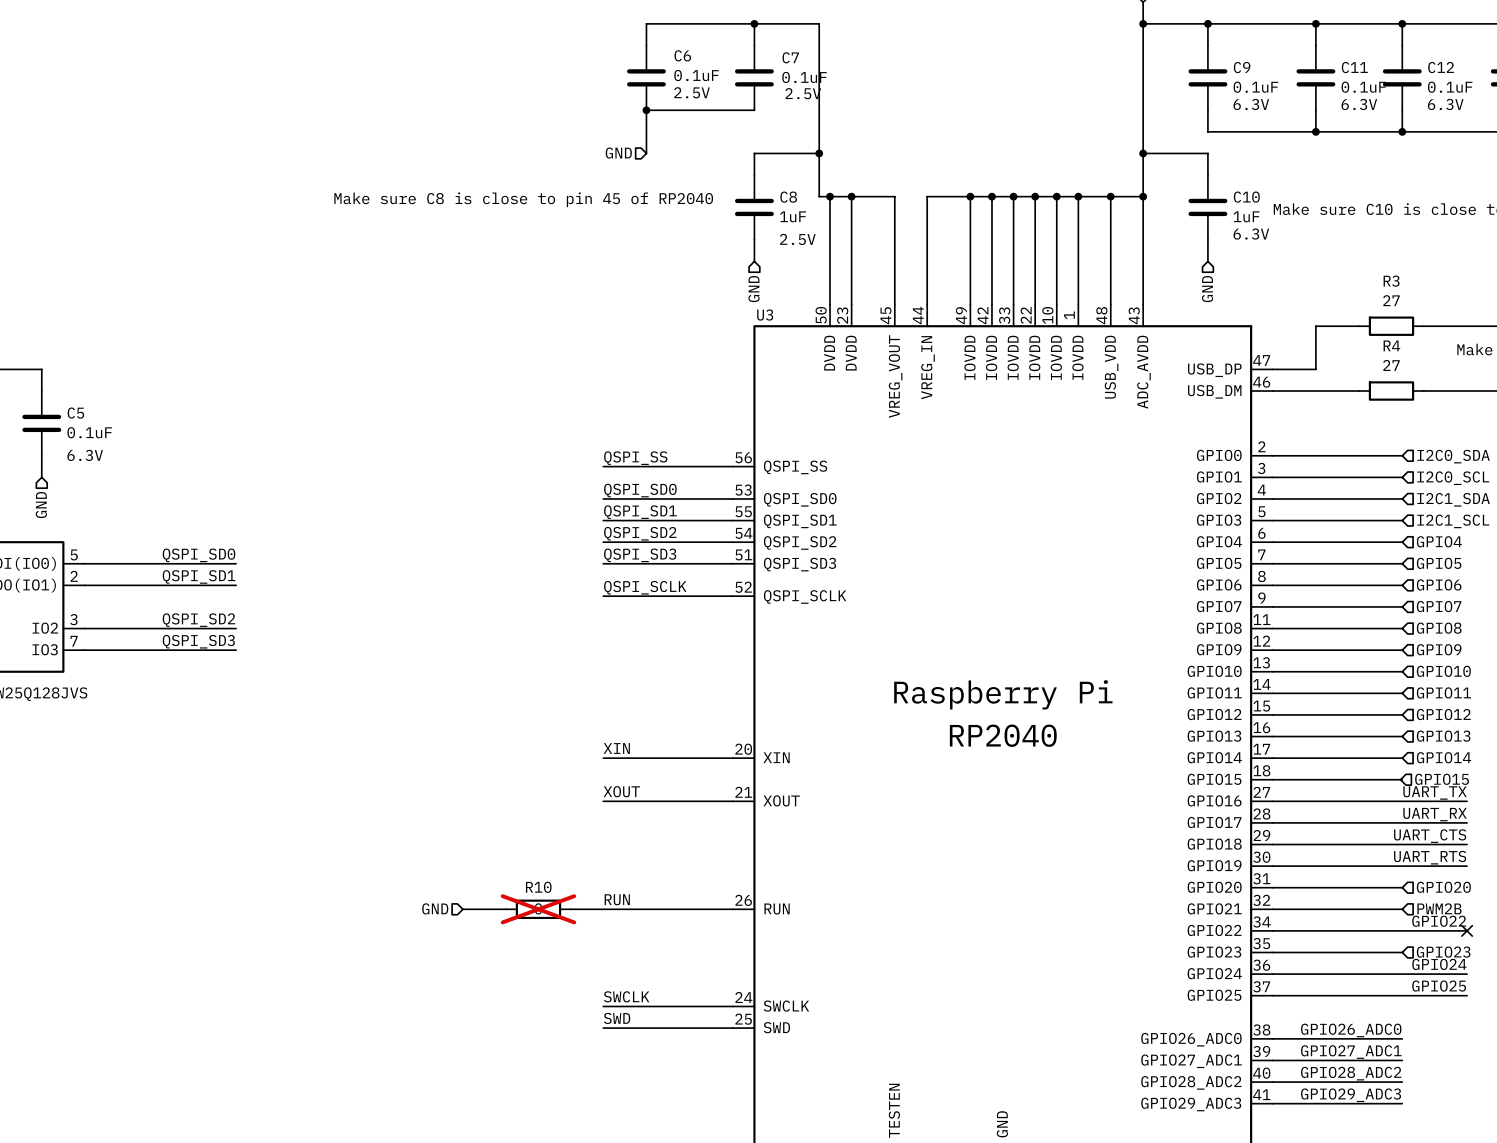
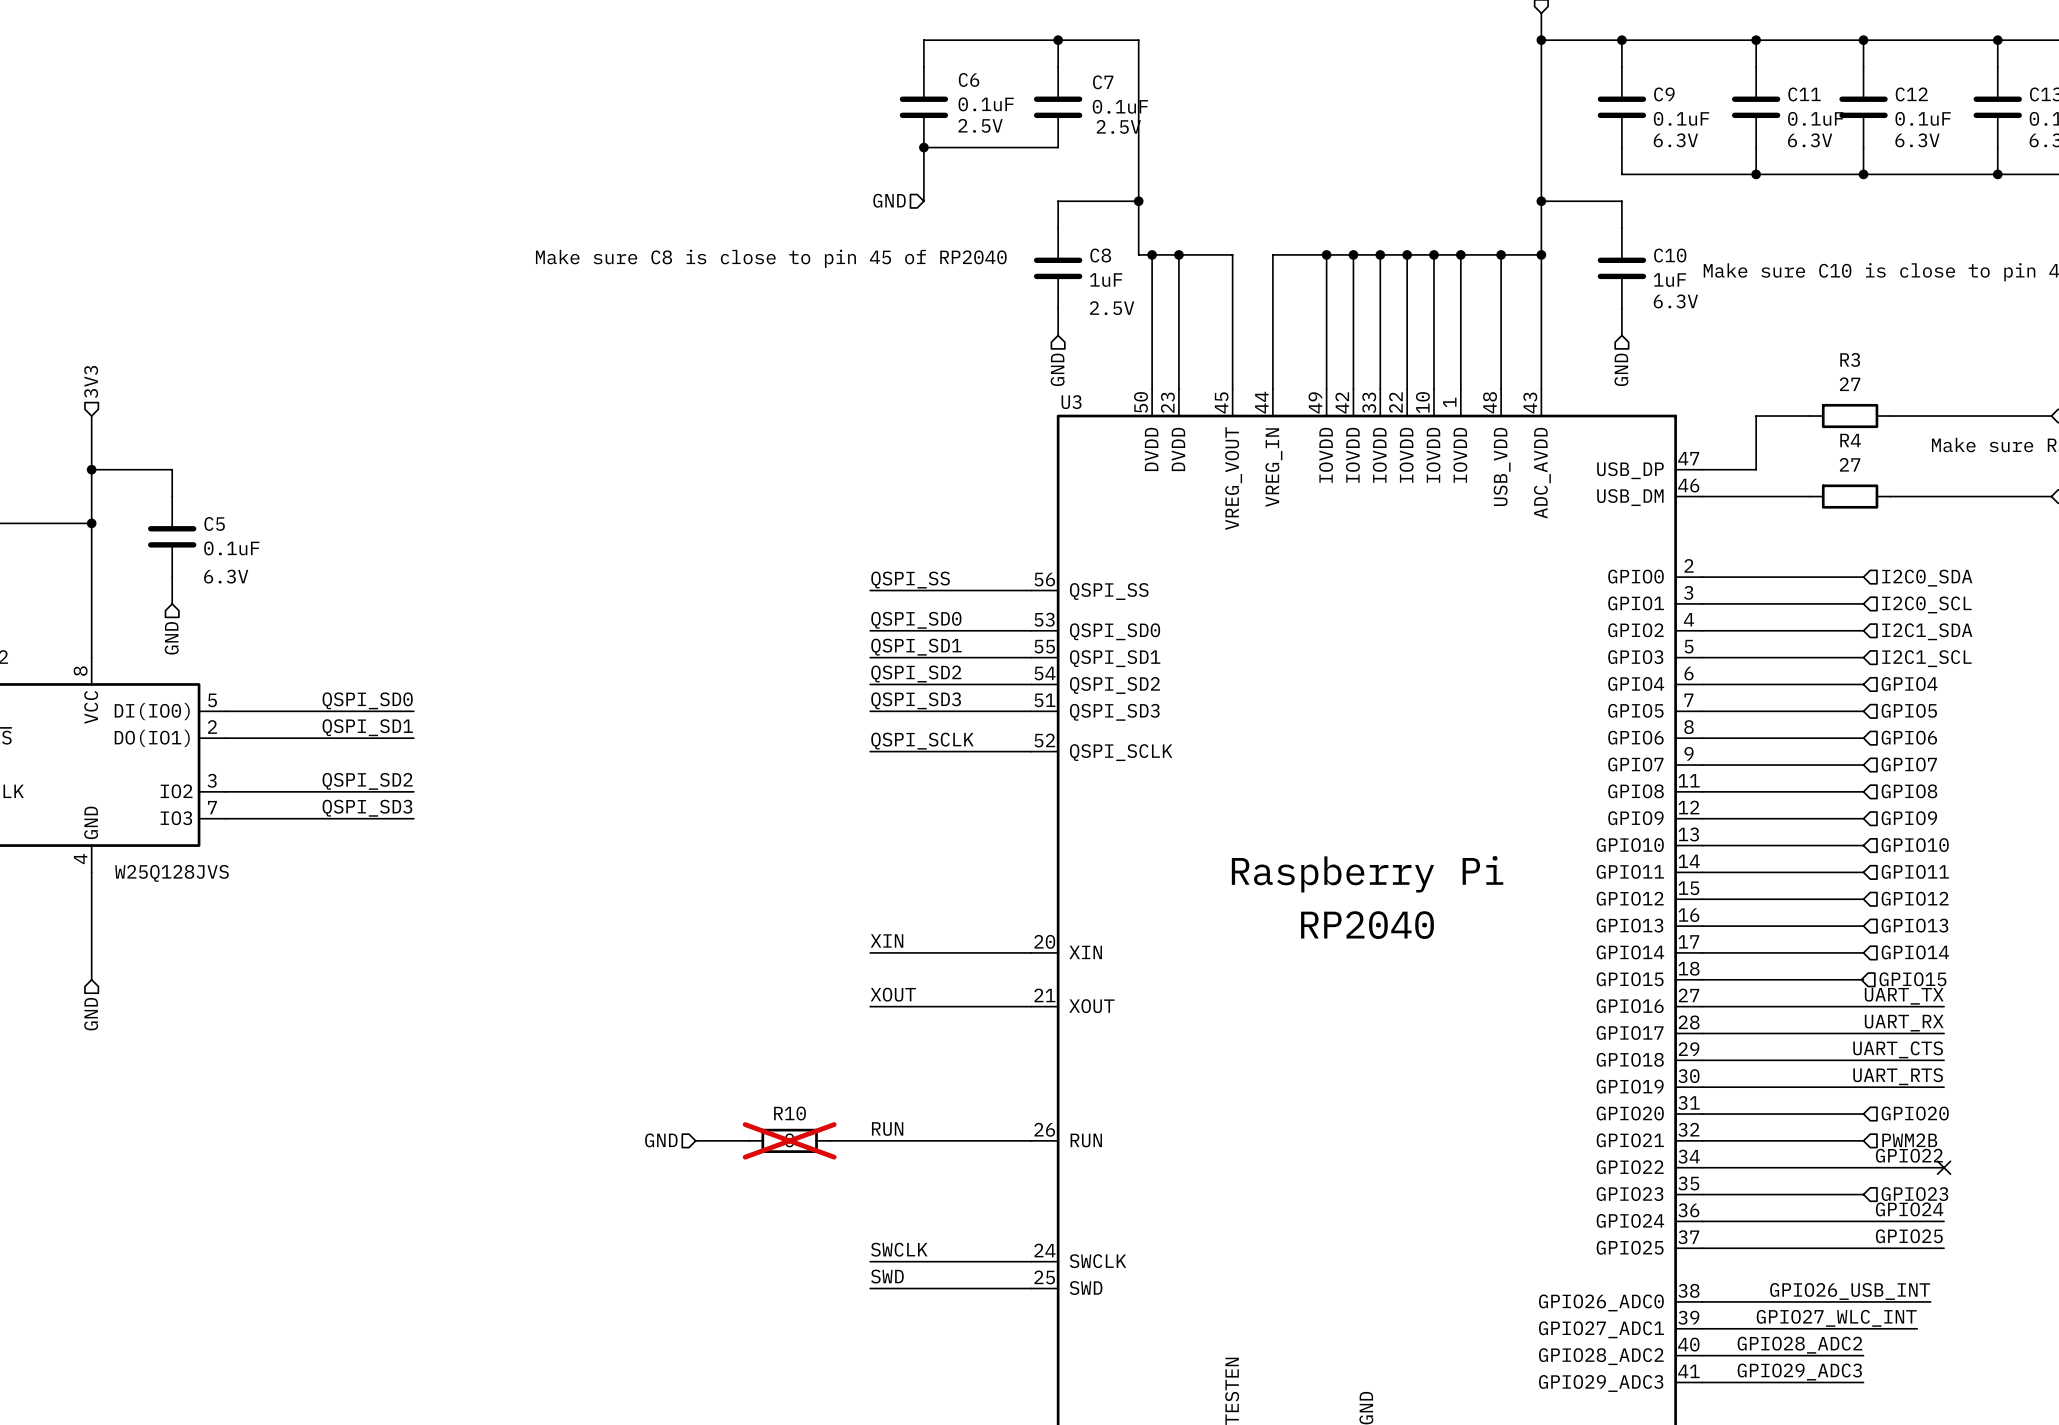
label: GPIO26_ADC0 (1351, 1030) -> none
label: none -> GPIO26_USB_INT (1850, 1291)
wire: none -> (1863, 1301) (1930, 1301)
label: GPIO27_ADC1 (1351, 1052) -> GPIO27_WLC_INT (1836, 1318)
wire: none -> (1863, 1328) (1917, 1328)

